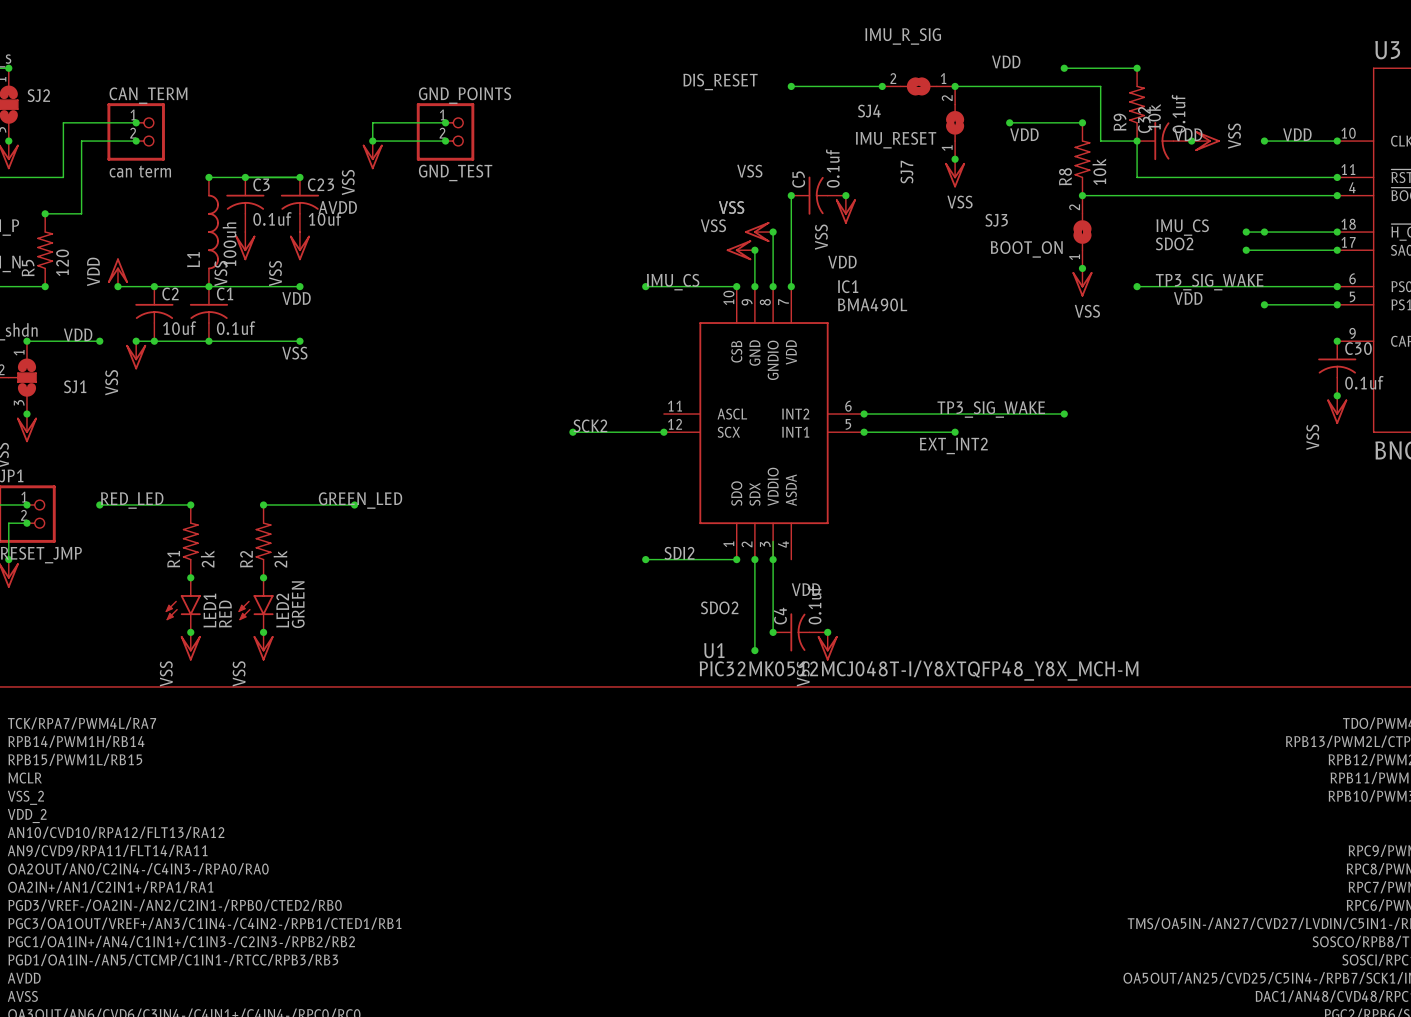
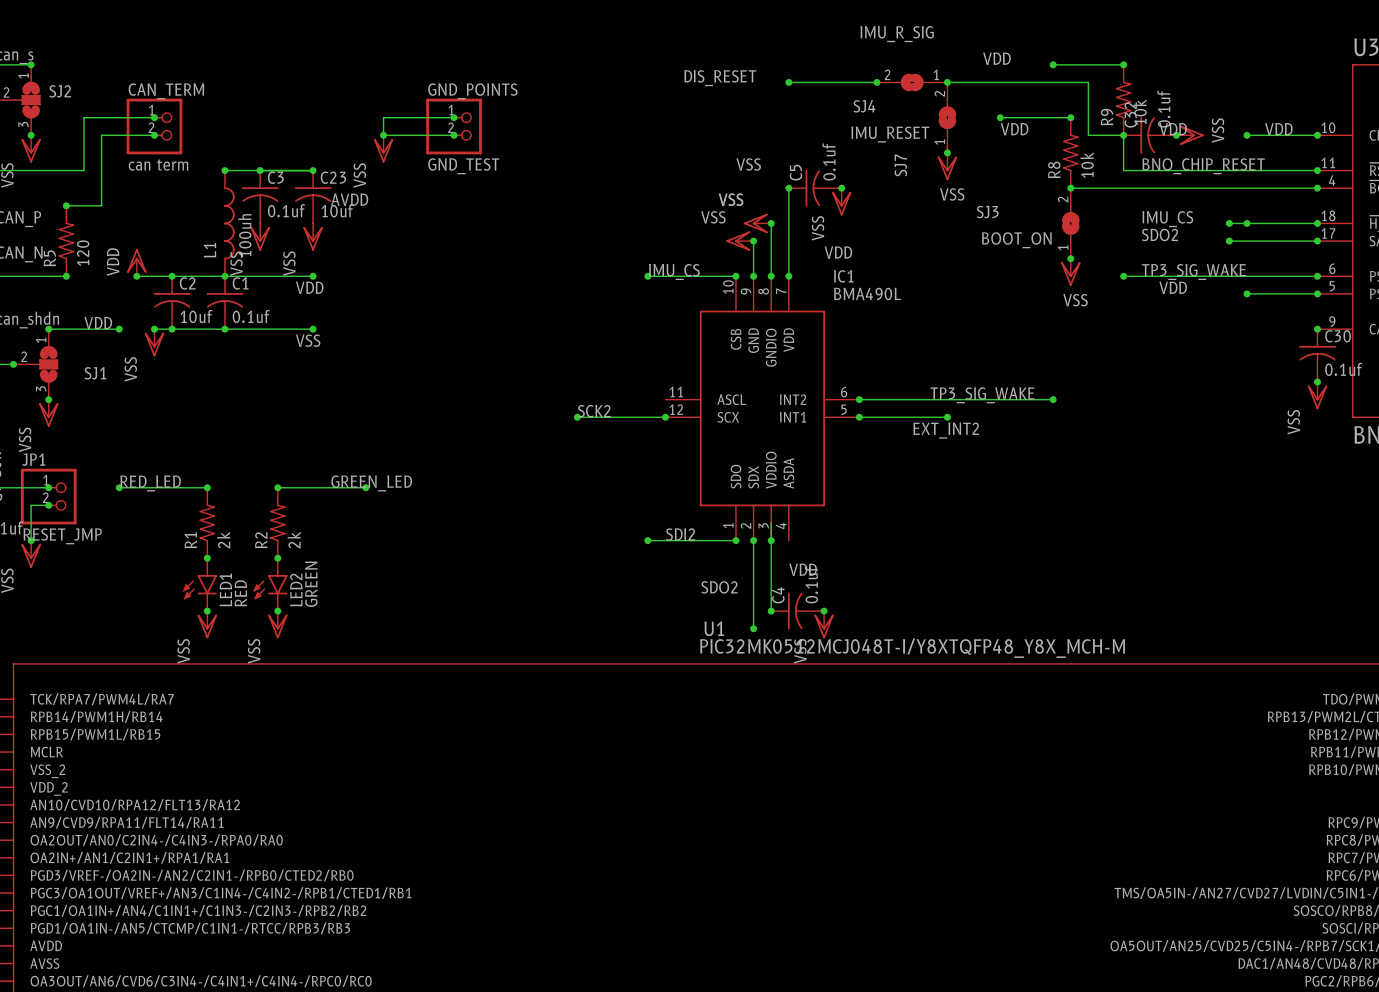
label: none -> BNO_CHIP_RESET (1203, 166)

